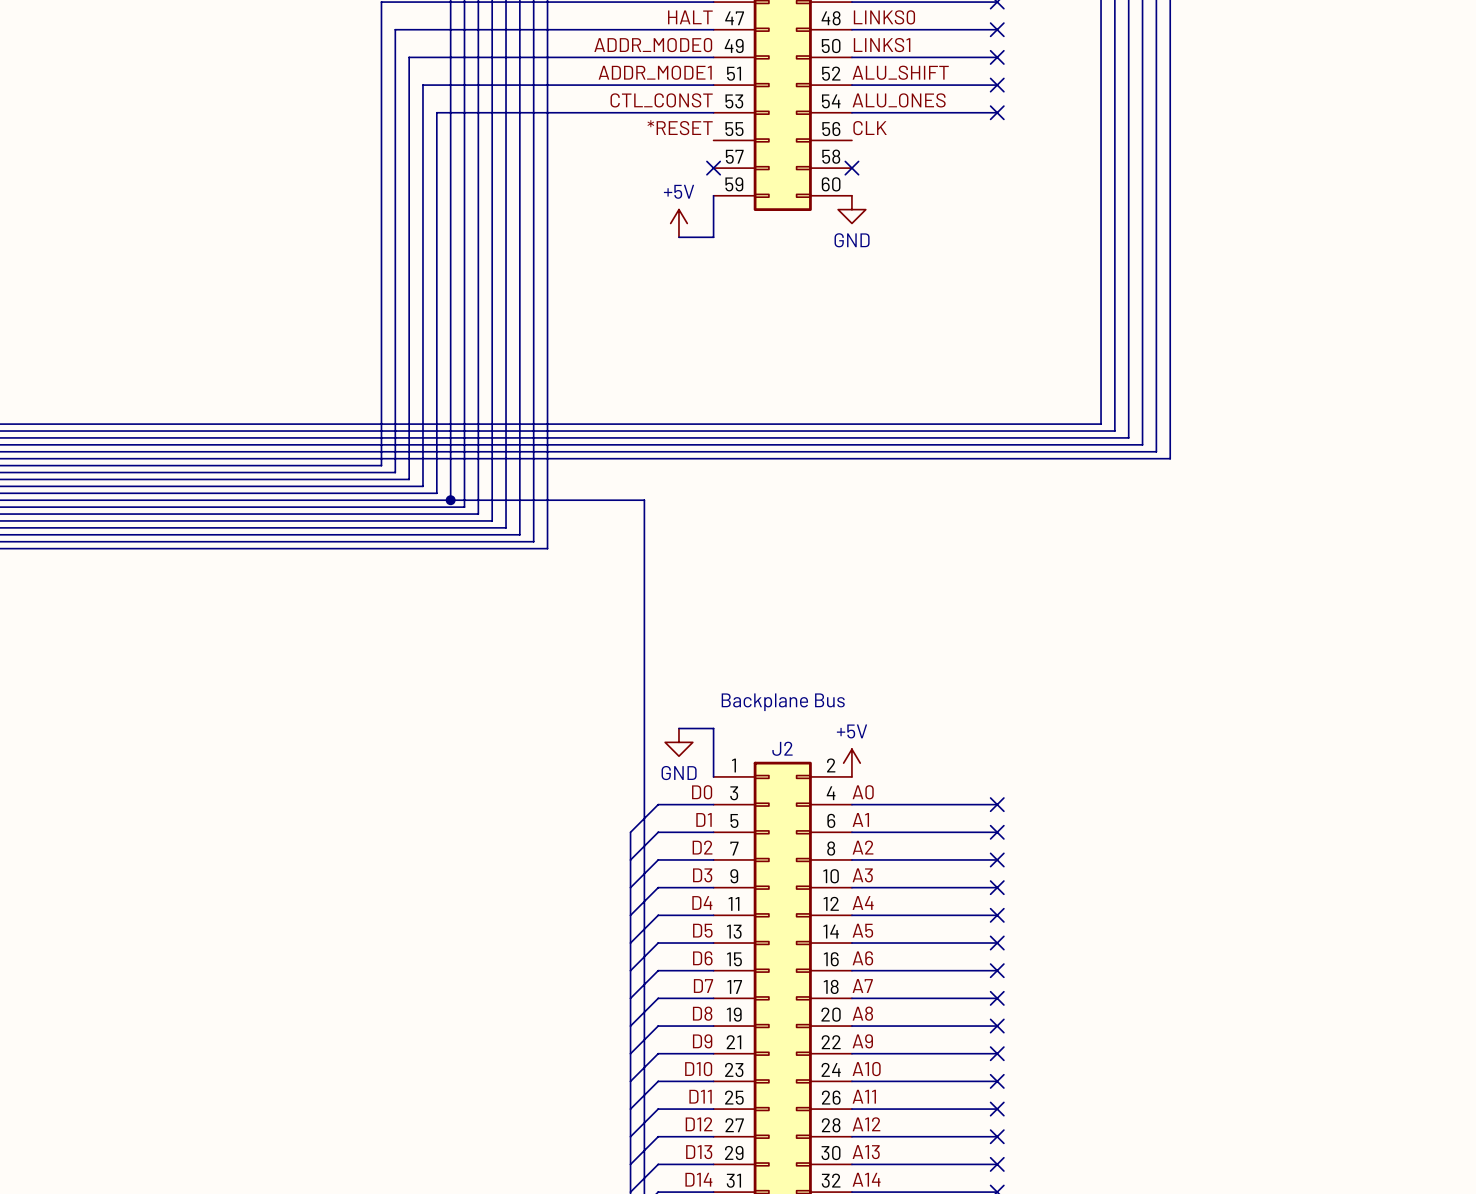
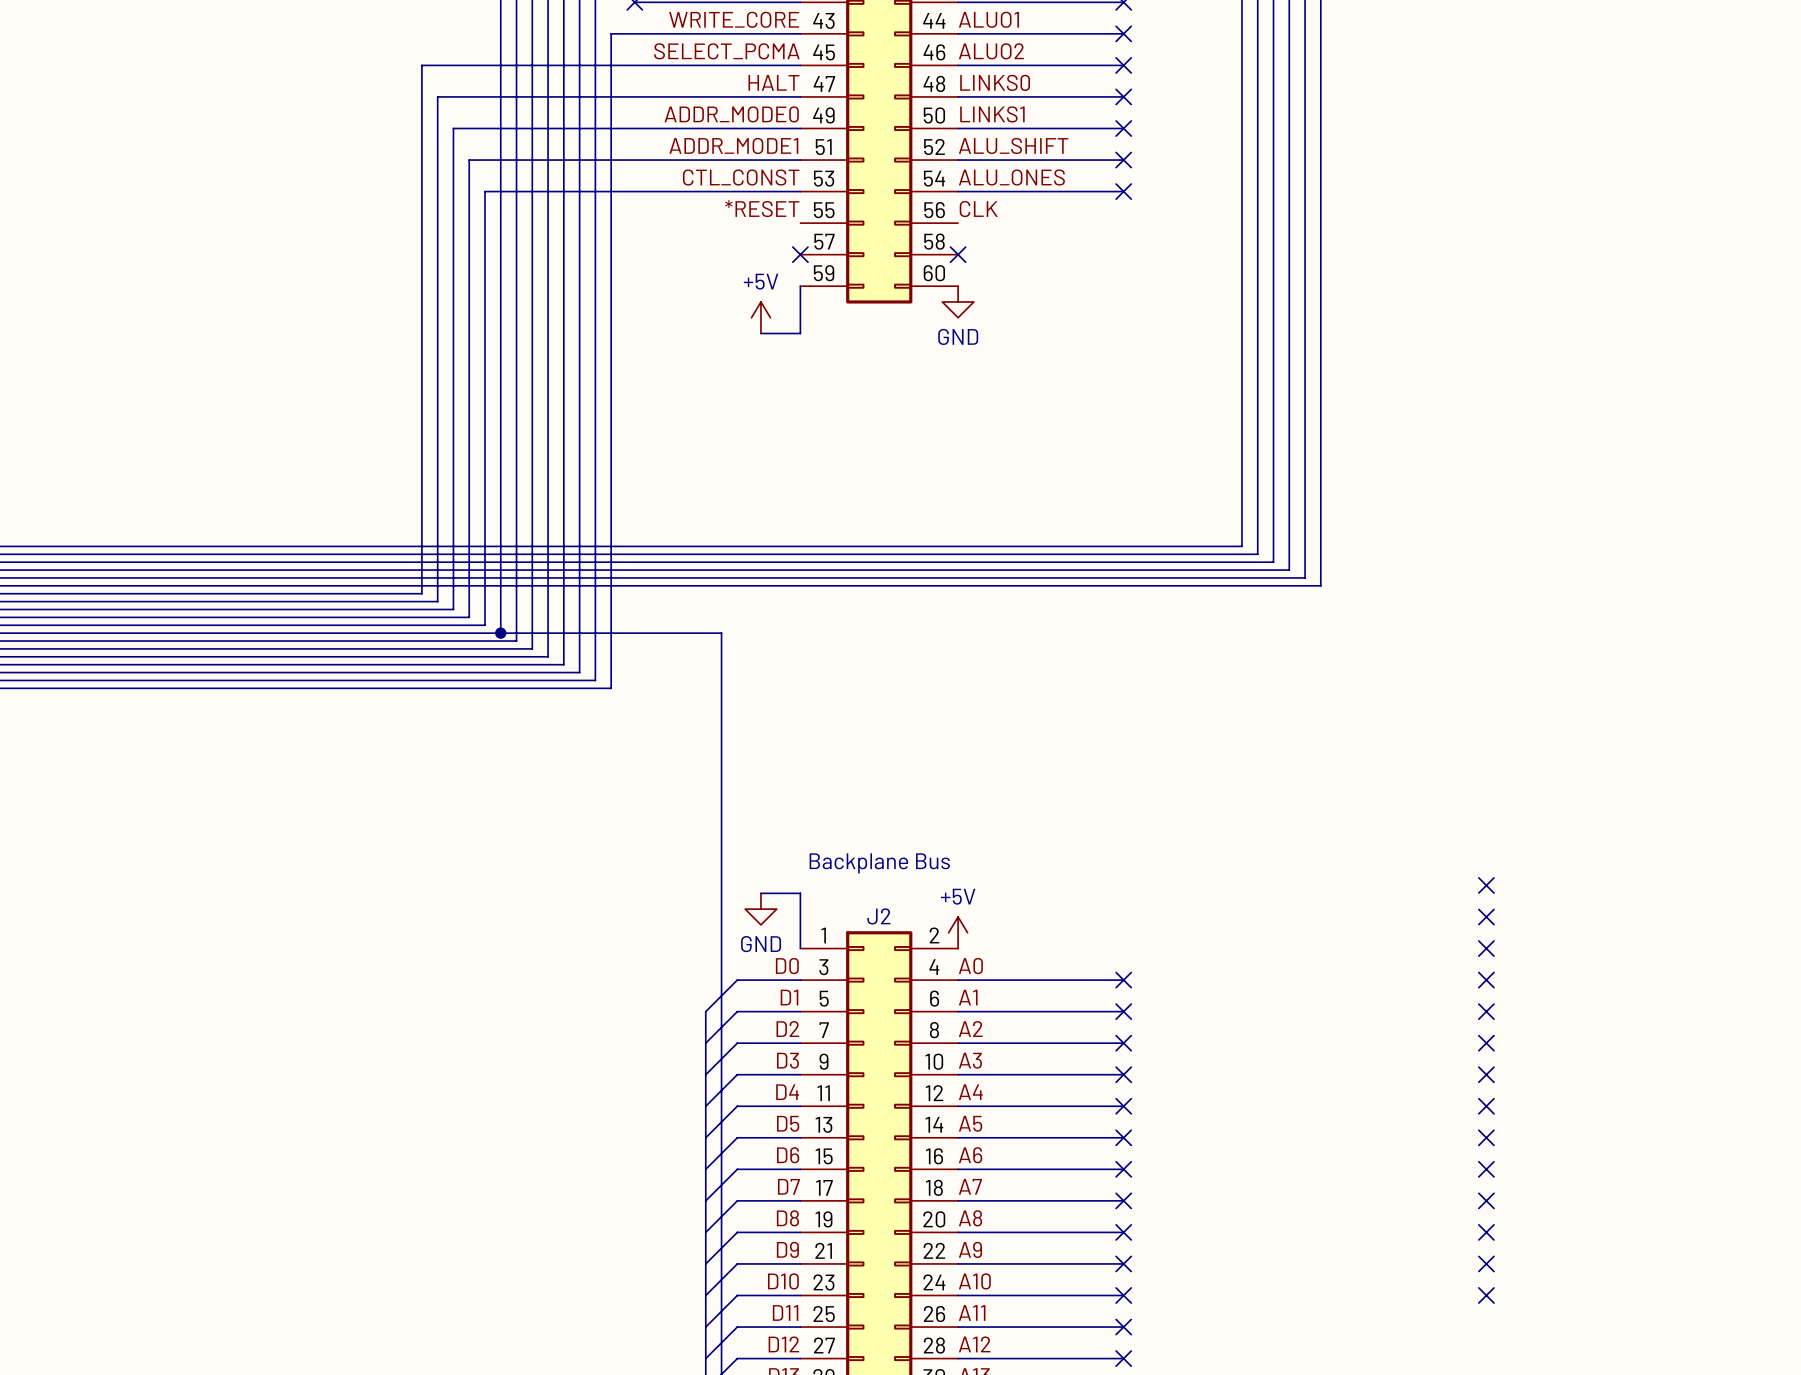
no-connect mark: none -> (1486, 885)
no-connect mark: none -> (1486, 917)
no-connect mark: none -> (1486, 948)
no-connect mark: none -> (1486, 980)
no-connect mark: none -> (1486, 1011)
no-connect mark: none -> (1486, 1043)
no-connect mark: none -> (1486, 1074)
no-connect mark: none -> (1486, 1106)
no-connect mark: none -> (1486, 1137)
no-connect mark: none -> (1486, 1169)
no-connect mark: none -> (1486, 1200)
no-connect mark: none -> (1486, 1232)
no-connect mark: none -> (1486, 1263)
no-connect mark: none -> (1486, 1295)

